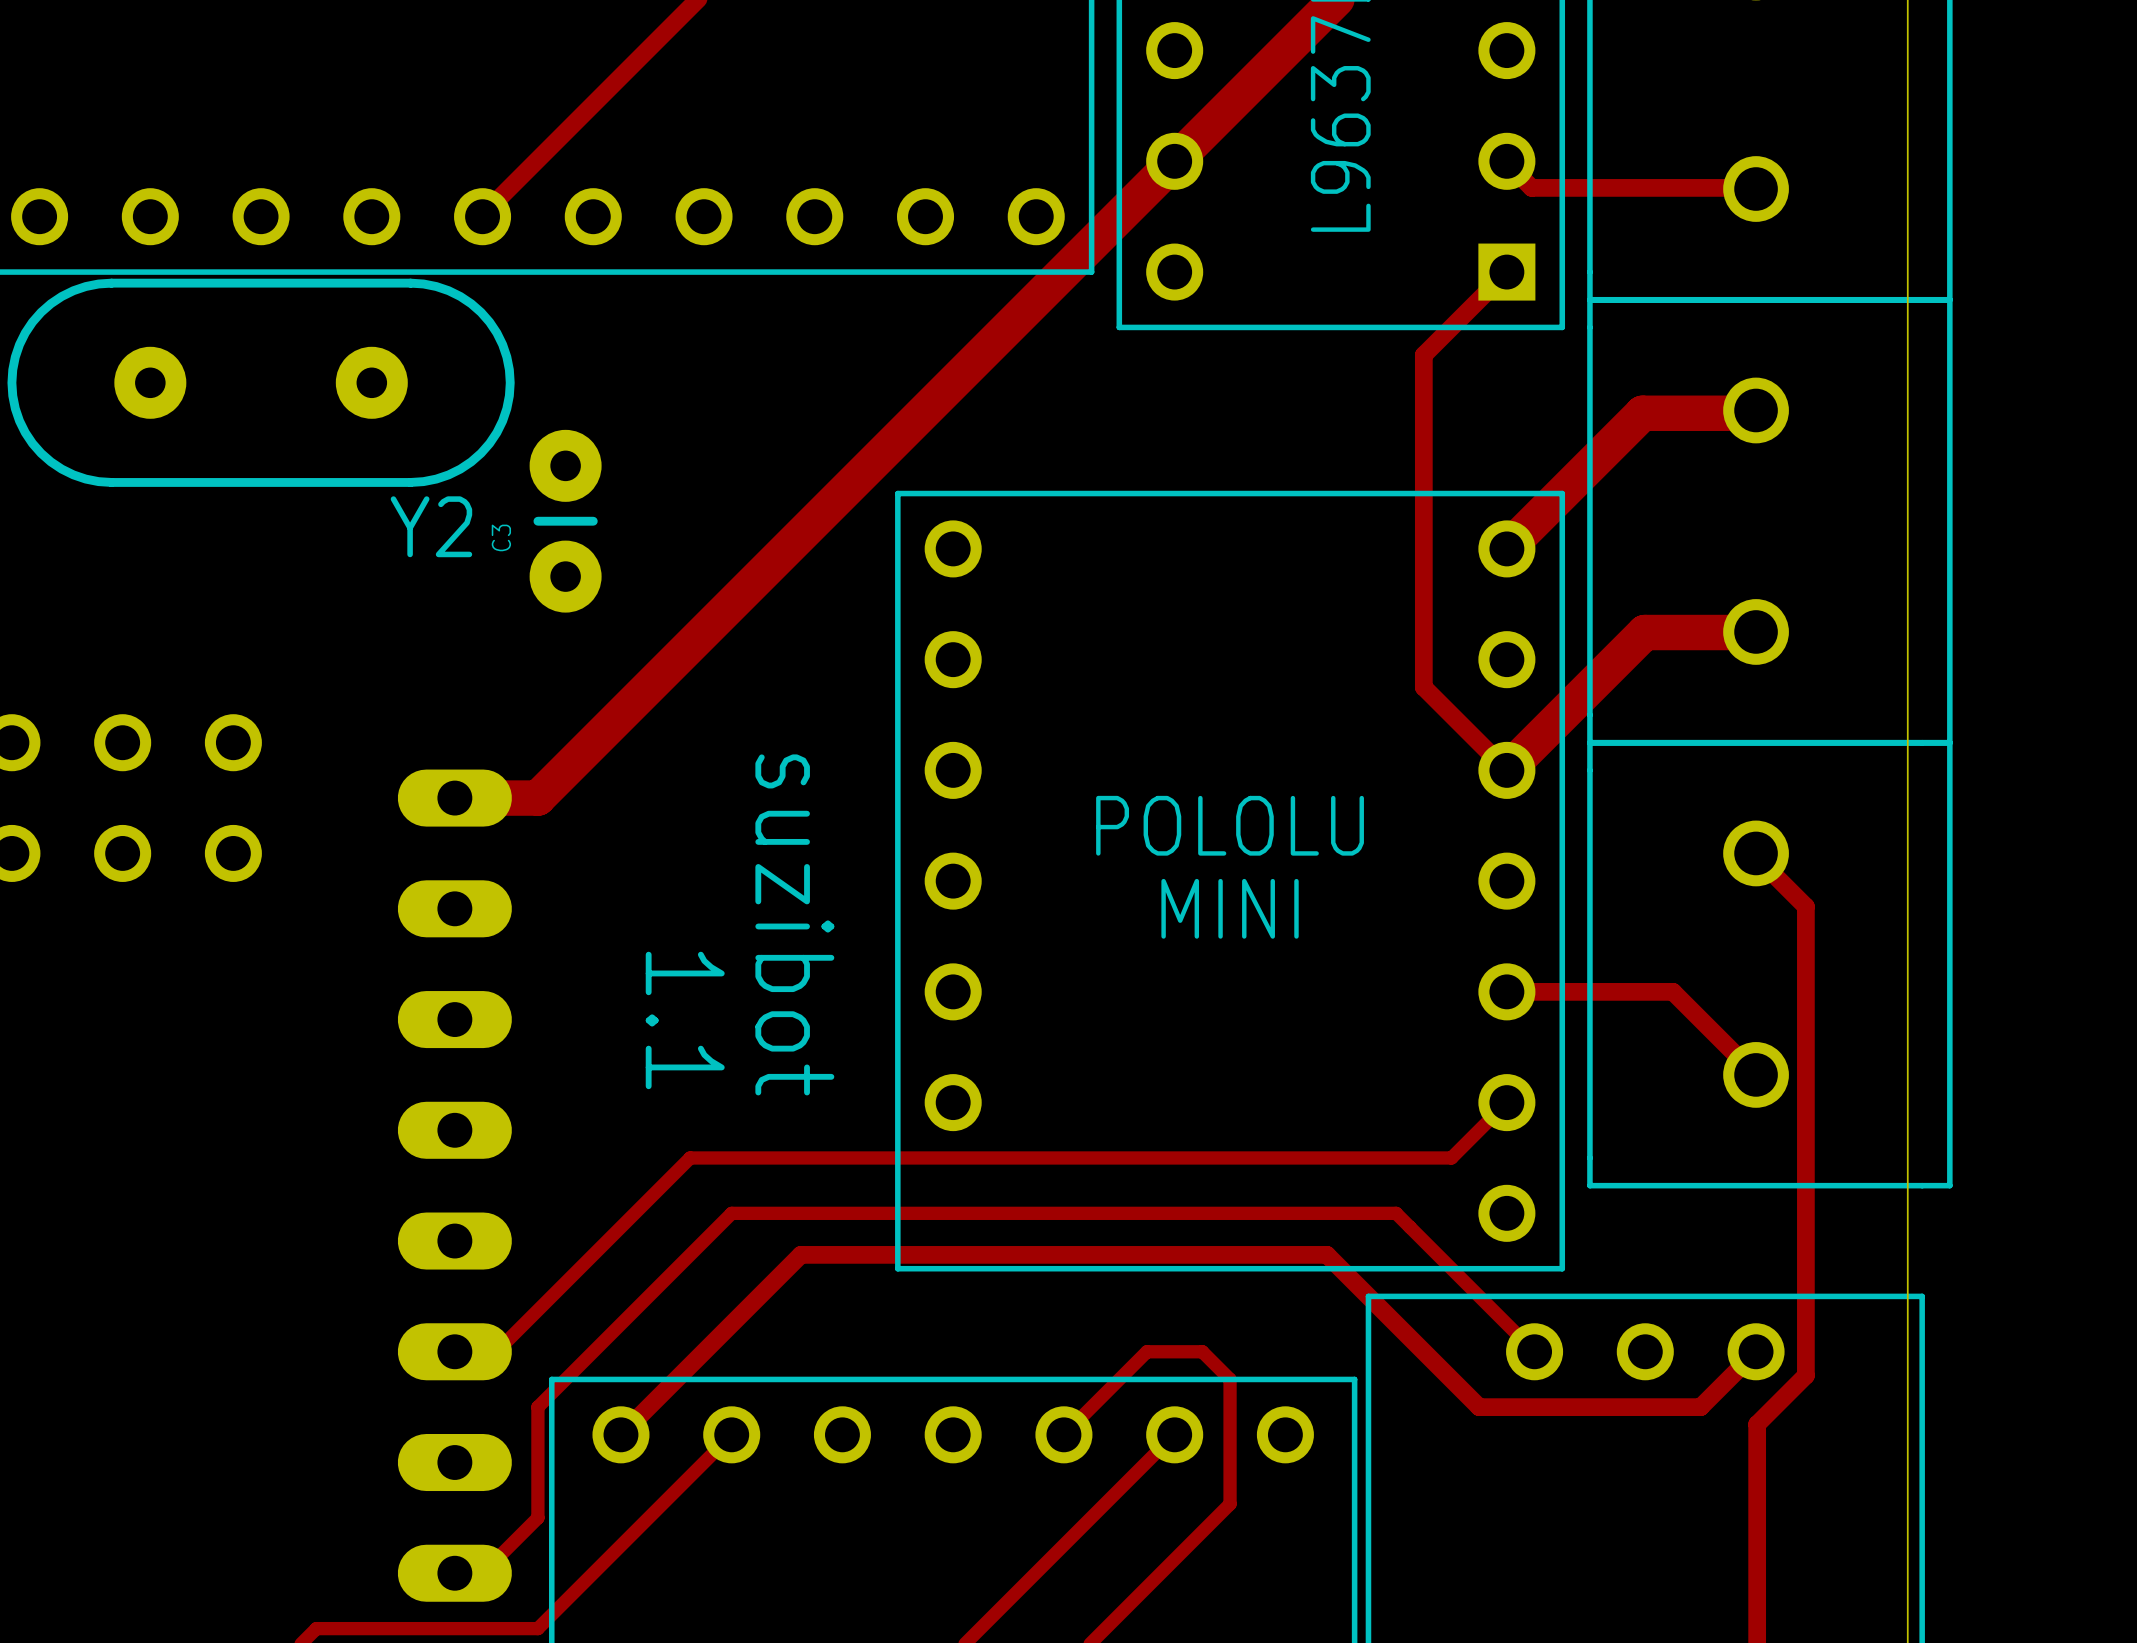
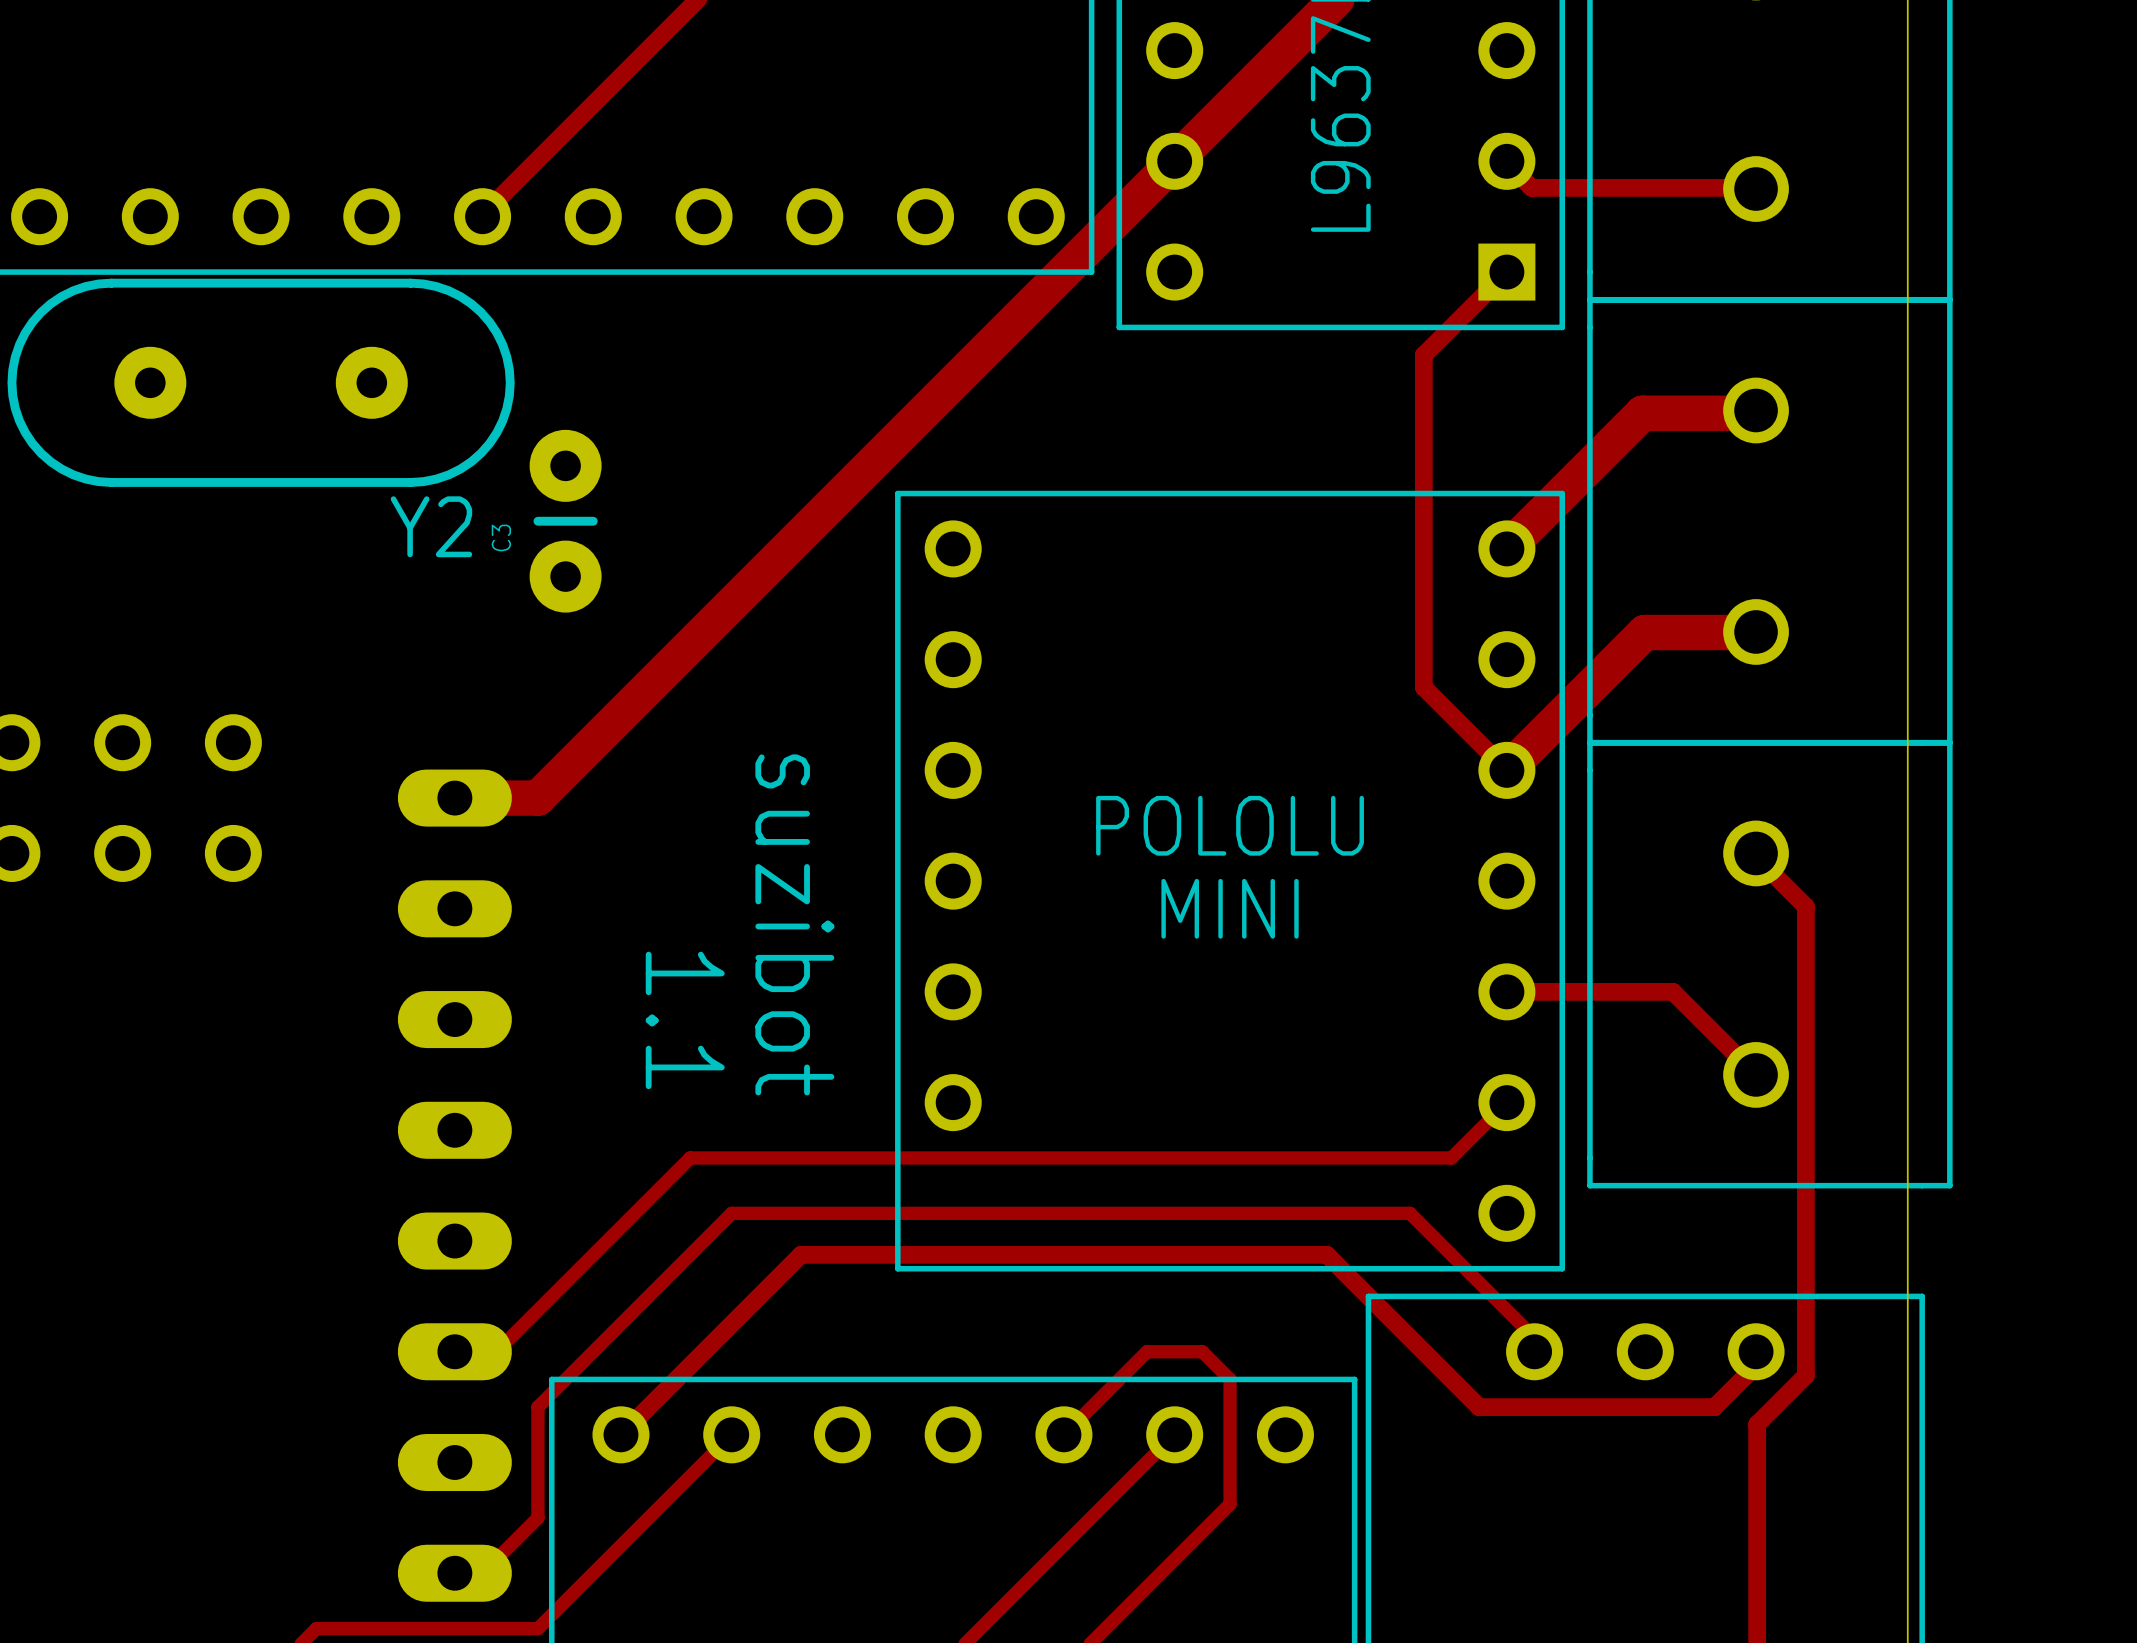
track: (1396, 1213) (1534, 1351) -> (1396, 1213) (1409, 1213) (1548, 1351)
track: (1756, 1351) (1700, 1407) -> (1769, 1351) (1714, 1407) (1700, 1407)

